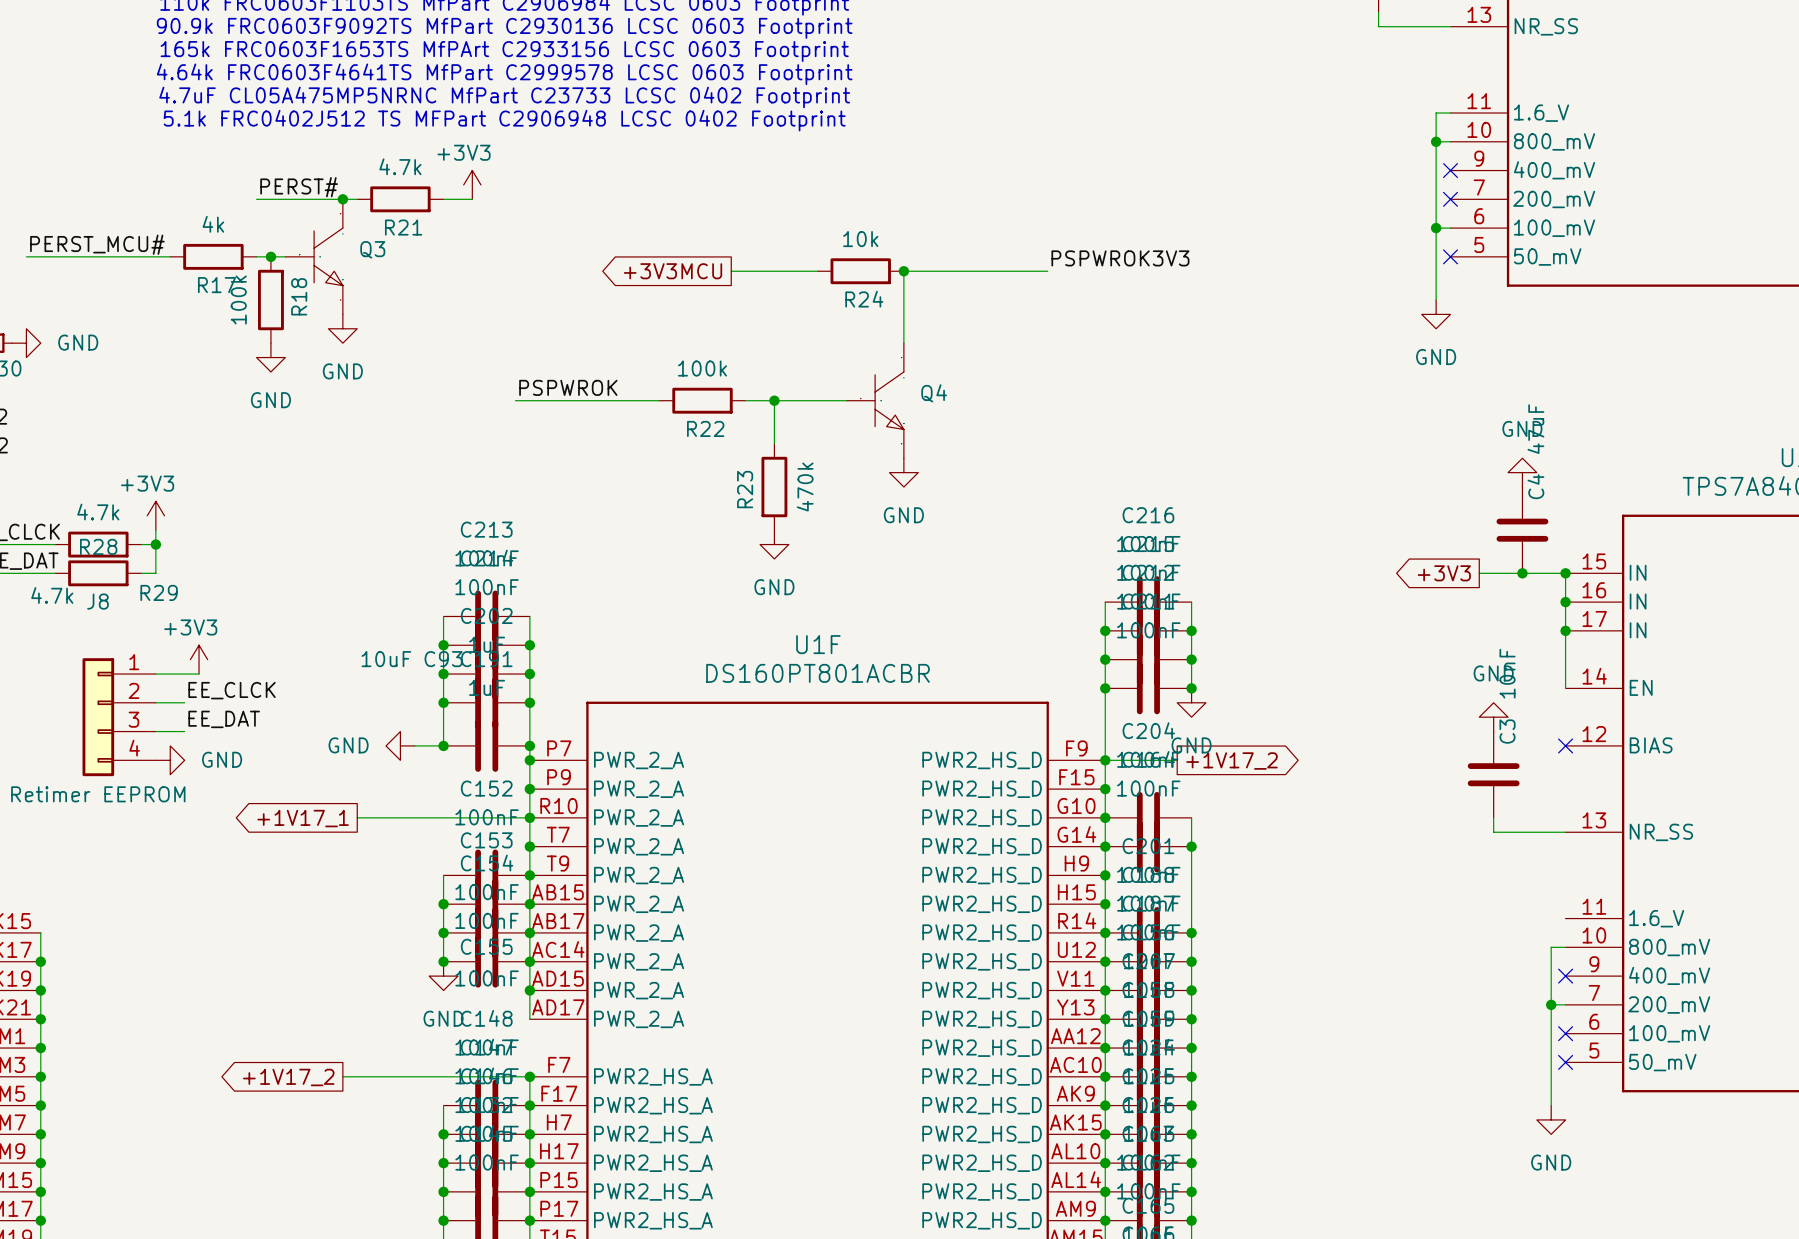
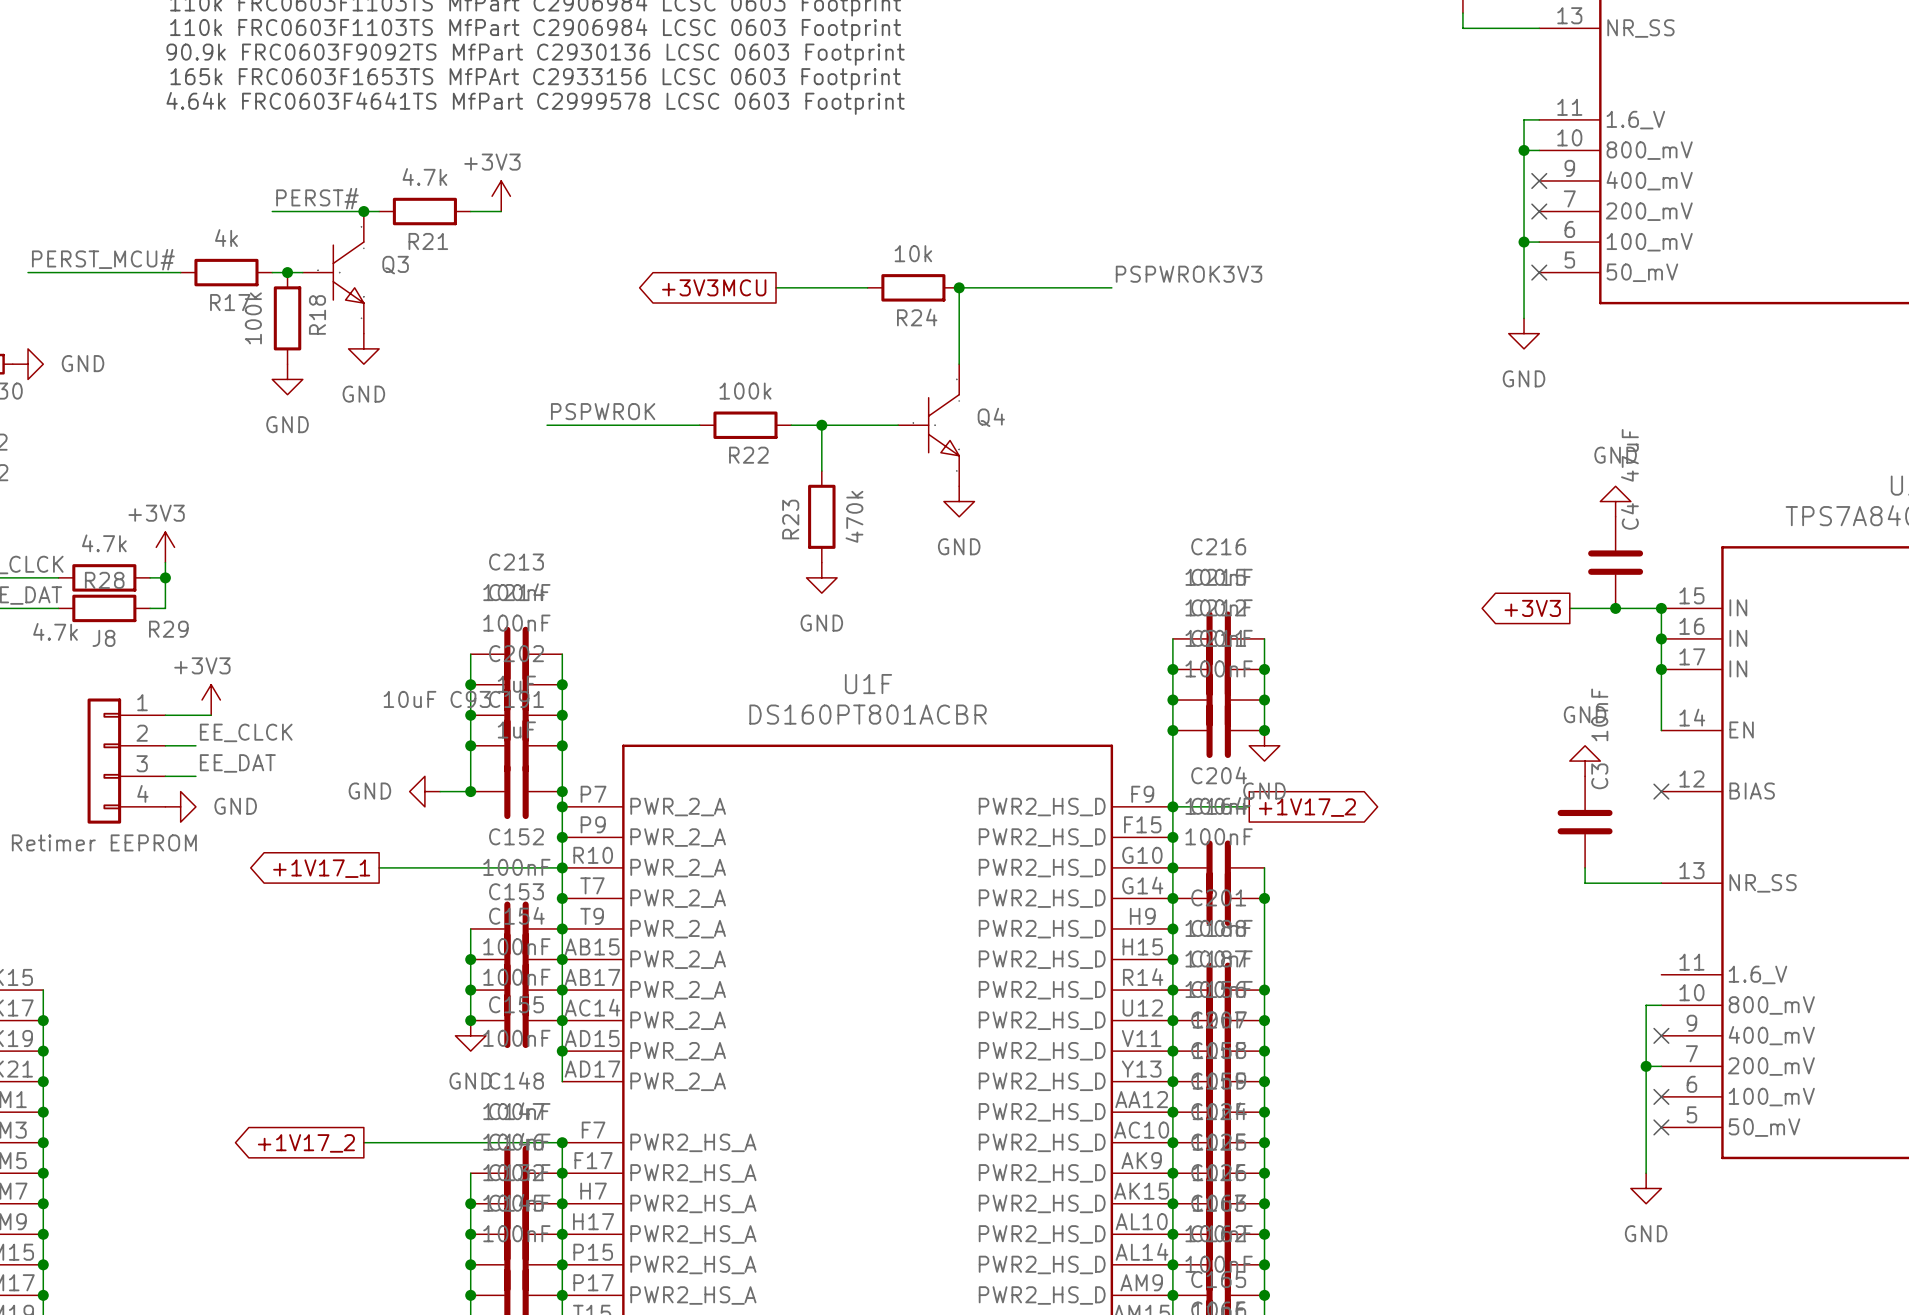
text: 90.9k FRC0603F9092TS MfPart C2930136 LCSC 0603 Footprint (504, 28) -> 110k FRC0603F1103TS MfPart C2906984 LCSC 0603 Footprint (535, 29)
text: 165k FRC0603F1653TS MfPArt C2933156 LCSC 0603 Footprint (504, 51) -> 90.9k FRC0603F9092TS MfPart C2930136 LCSC 0603 Footprint (535, 54)
text: 4.64k FRC0603F4641TS MfPart C2999578 LCSC 0603 Footprint (504, 74) -> 165k FRC0603F1653TS MfPArt C2933156 LCSC 0603 Footprint (535, 79)
text: 4.7uF CL05A475MP5NRNC MfPart C23733 LCSC 0402 Footprint (504, 97) -> 4.64k FRC0603F4641TS MfPart C2999578 LCSC 0603 Footprint (535, 103)
text: 5.1k FRC0402J512 TS MFPart C2906948 LCSC 0402 Footprint (504, 120) -> none

